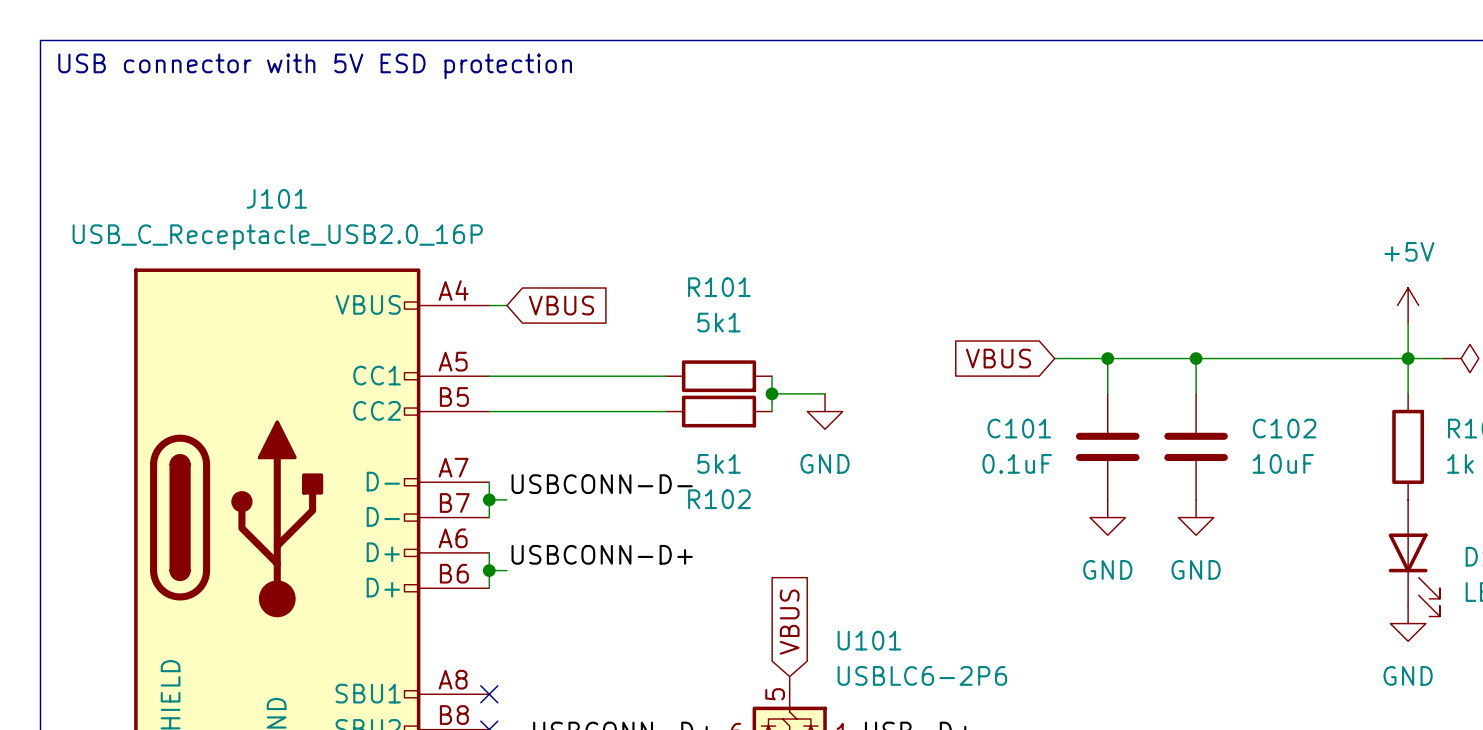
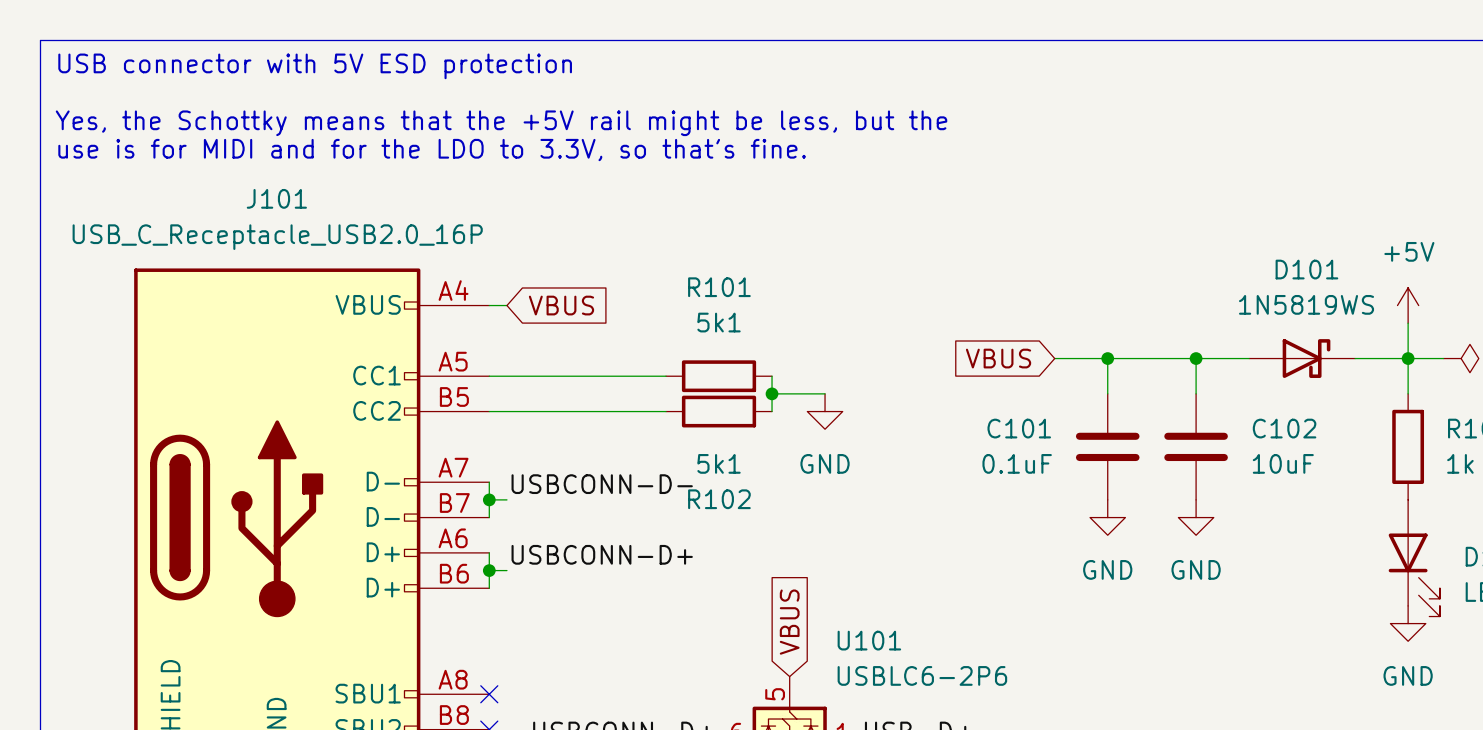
text: none -> Yes, the Schottky means that the +5V rail might be less, but the (501, 123)
text: none -> use is for MIDI and for the LDO to 3.3V, so that's fine. (432, 150)
D101: none -> 1N5819WS (1302, 358)

